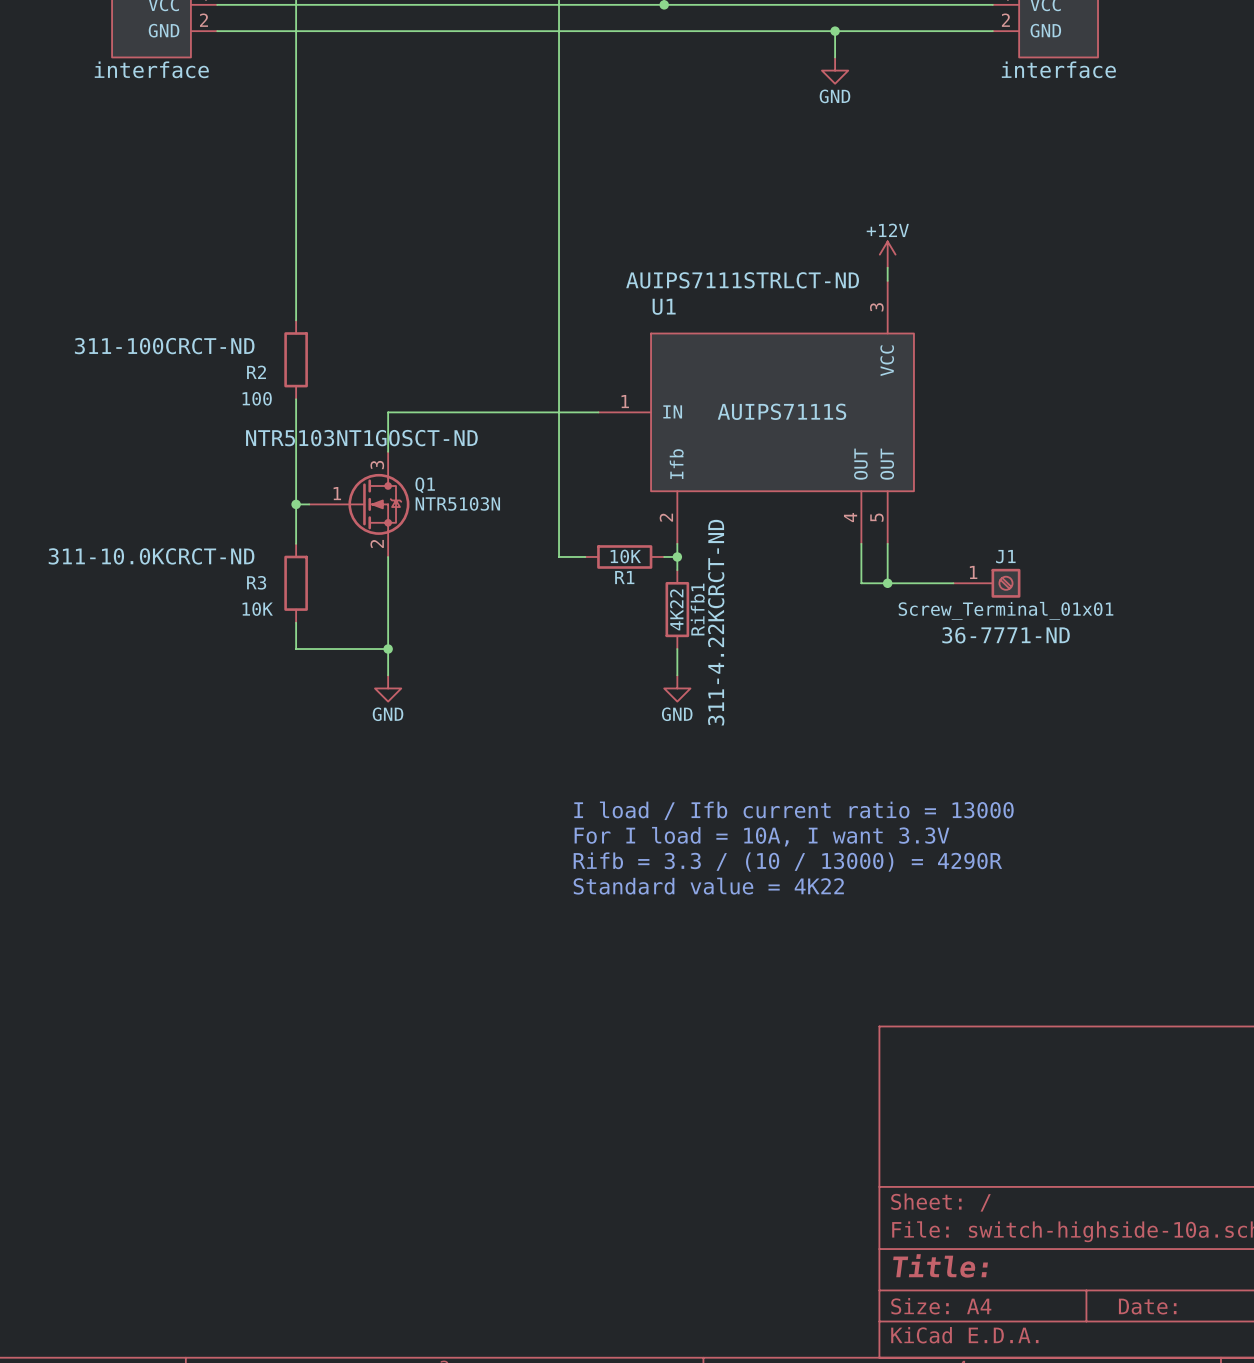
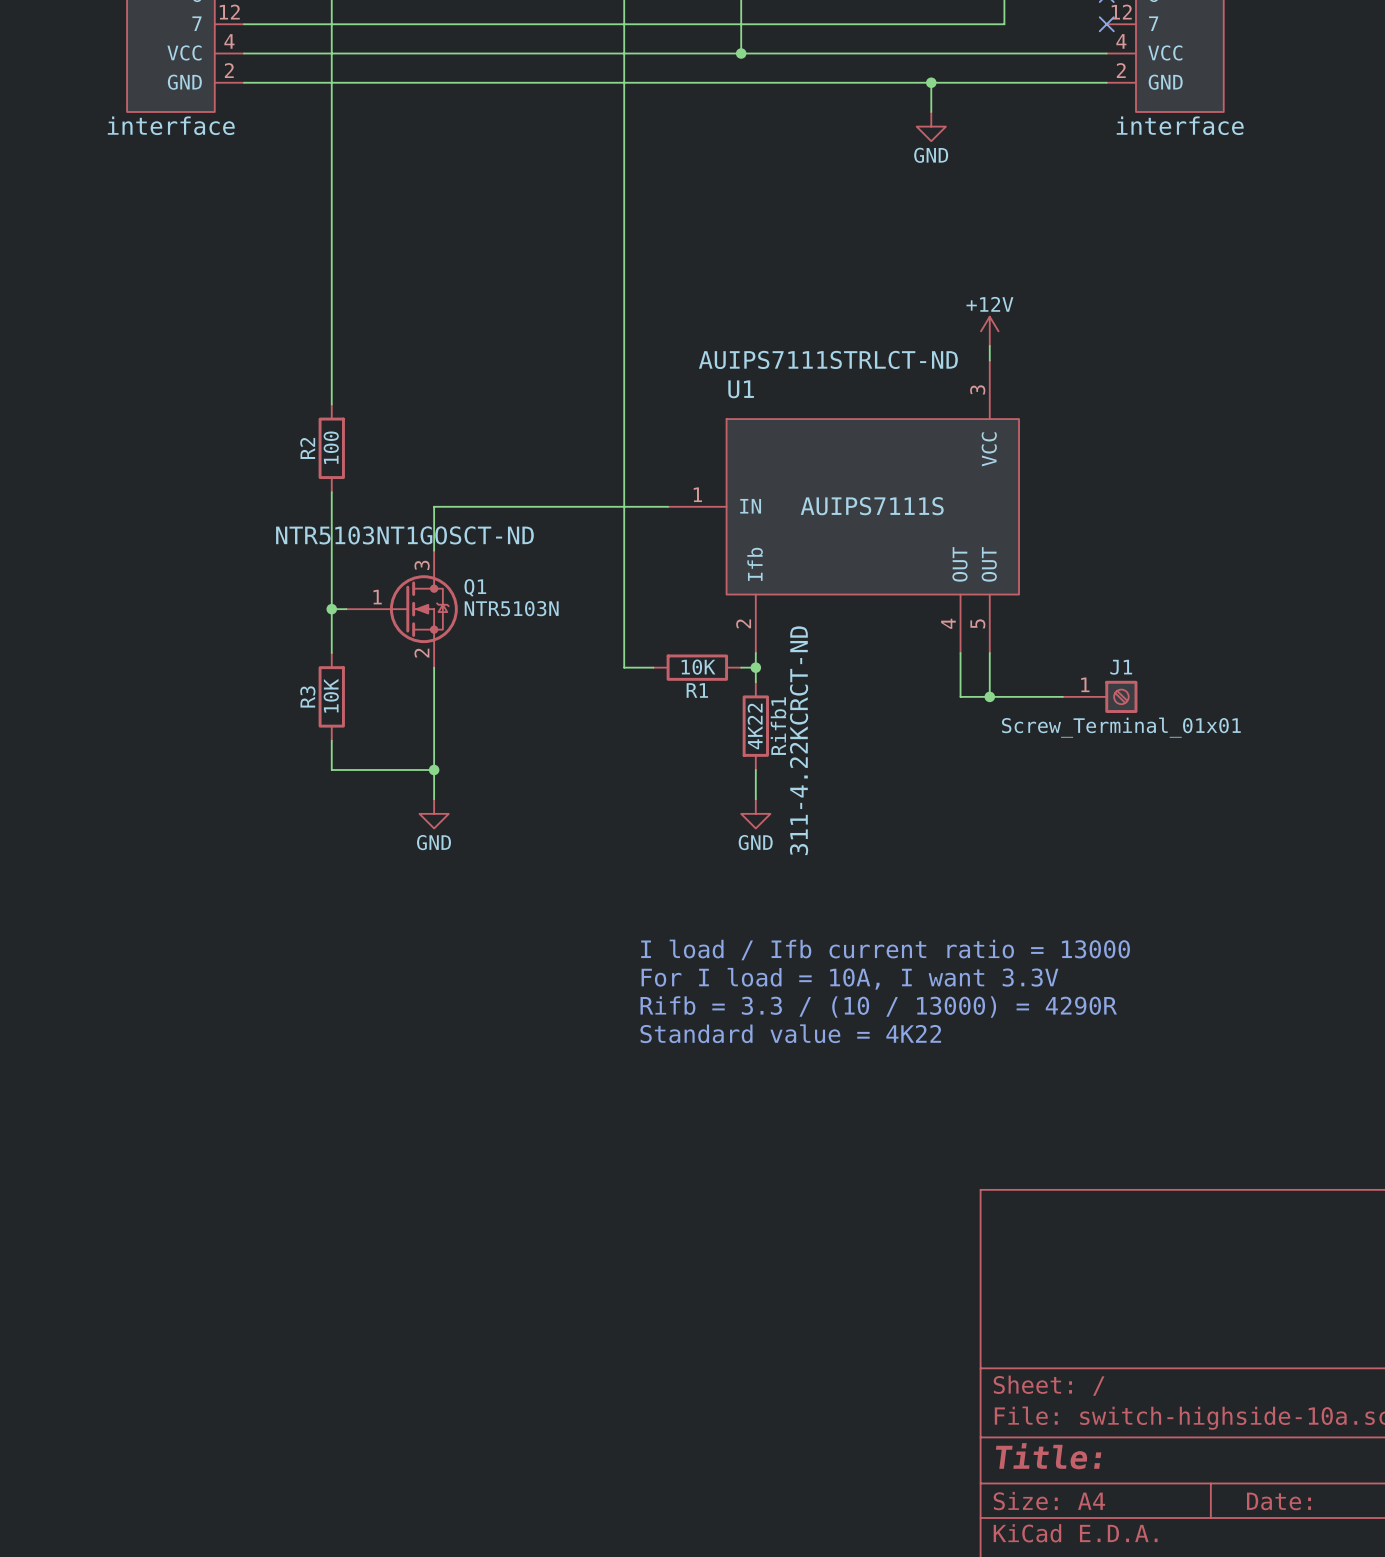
R2 text: 311-100CRCT-ND (164, 346) -> none
R2 name rotation: 0° (256, 372) -> 90° counterclockwise (307, 448)
R2 value rotation: 0° (257, 398) -> 90° counterclockwise (331, 447)
R2 value position: 100 (257, 398) -> 100 (331, 447)
R3 text: 311-10.0KCRCT-ND (151, 556) -> none
R3 name rotation: 0° (256, 582) -> 90° counterclockwise (307, 696)
R3 value rotation: 0° (257, 609) -> 90° counterclockwise (331, 695)
R3 value position: 10K (257, 609) -> 10K (331, 695)
J1 text: 36-7771-ND (1006, 635) -> none

